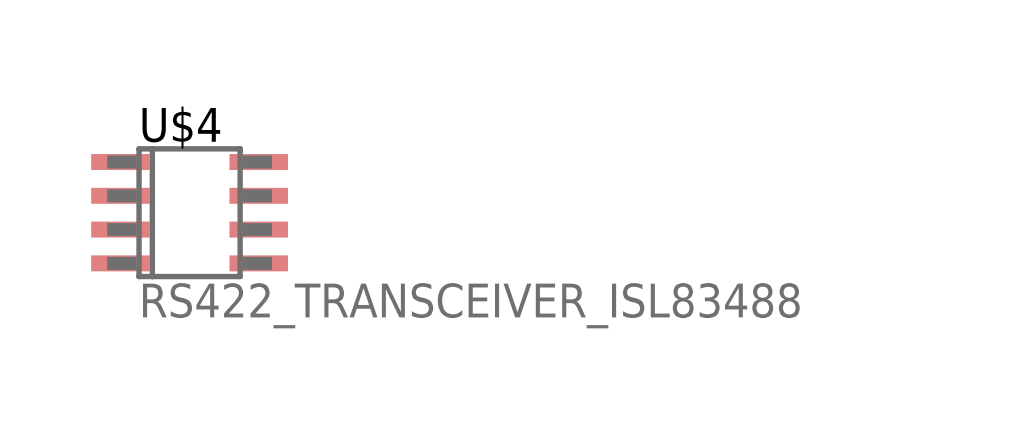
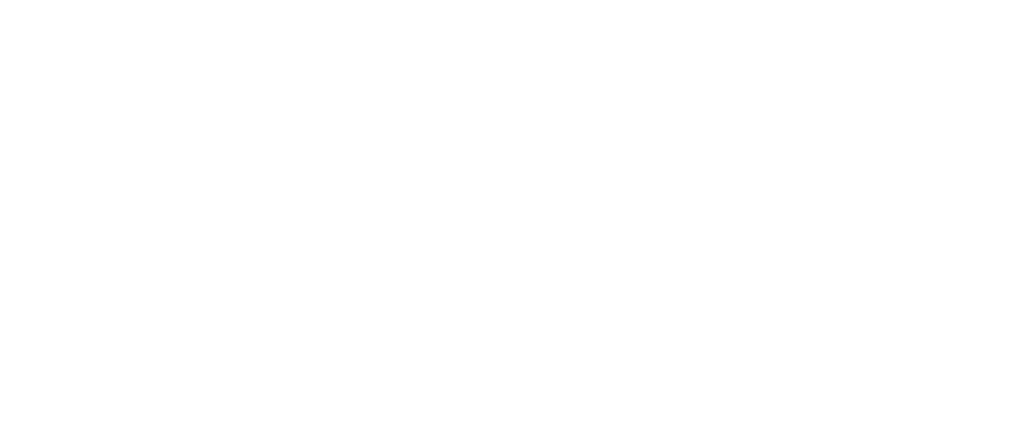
U$4: RS422_TRANSCEIVER_ISL83488 (189, 212) -> none

